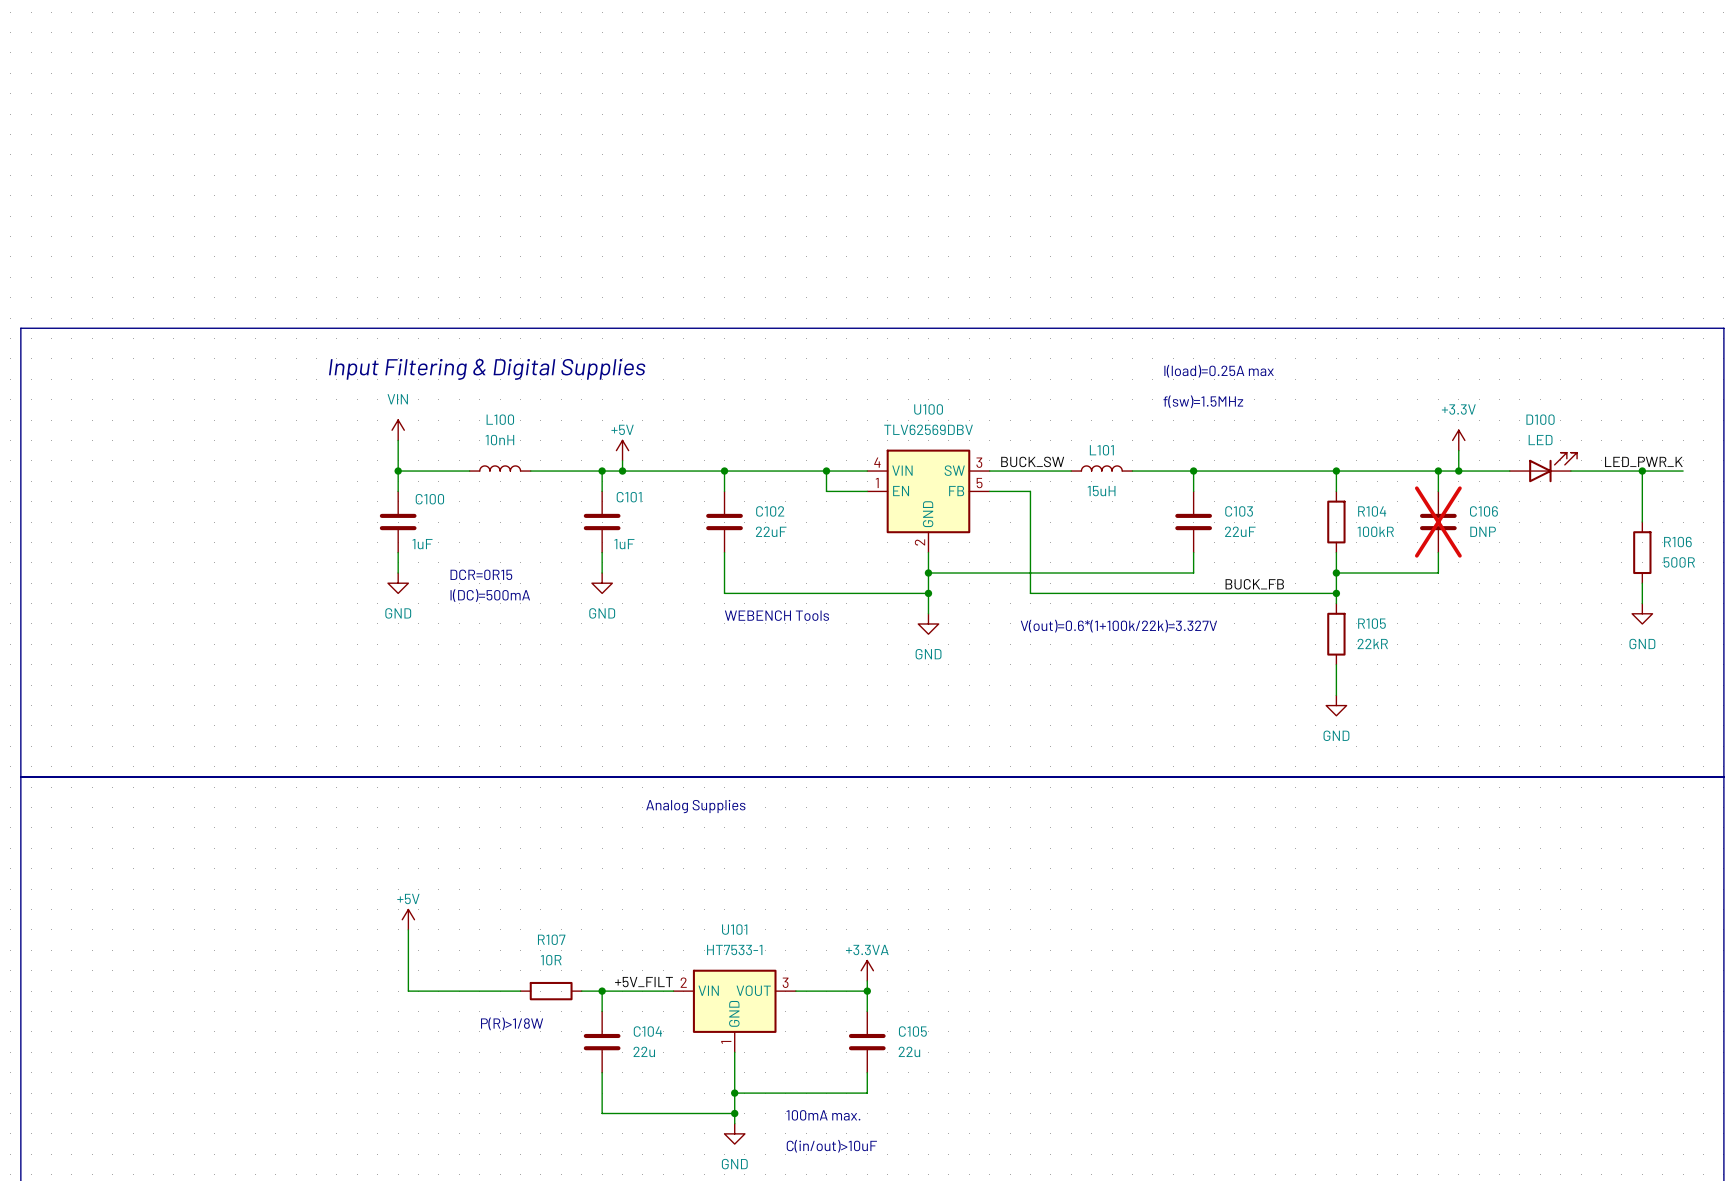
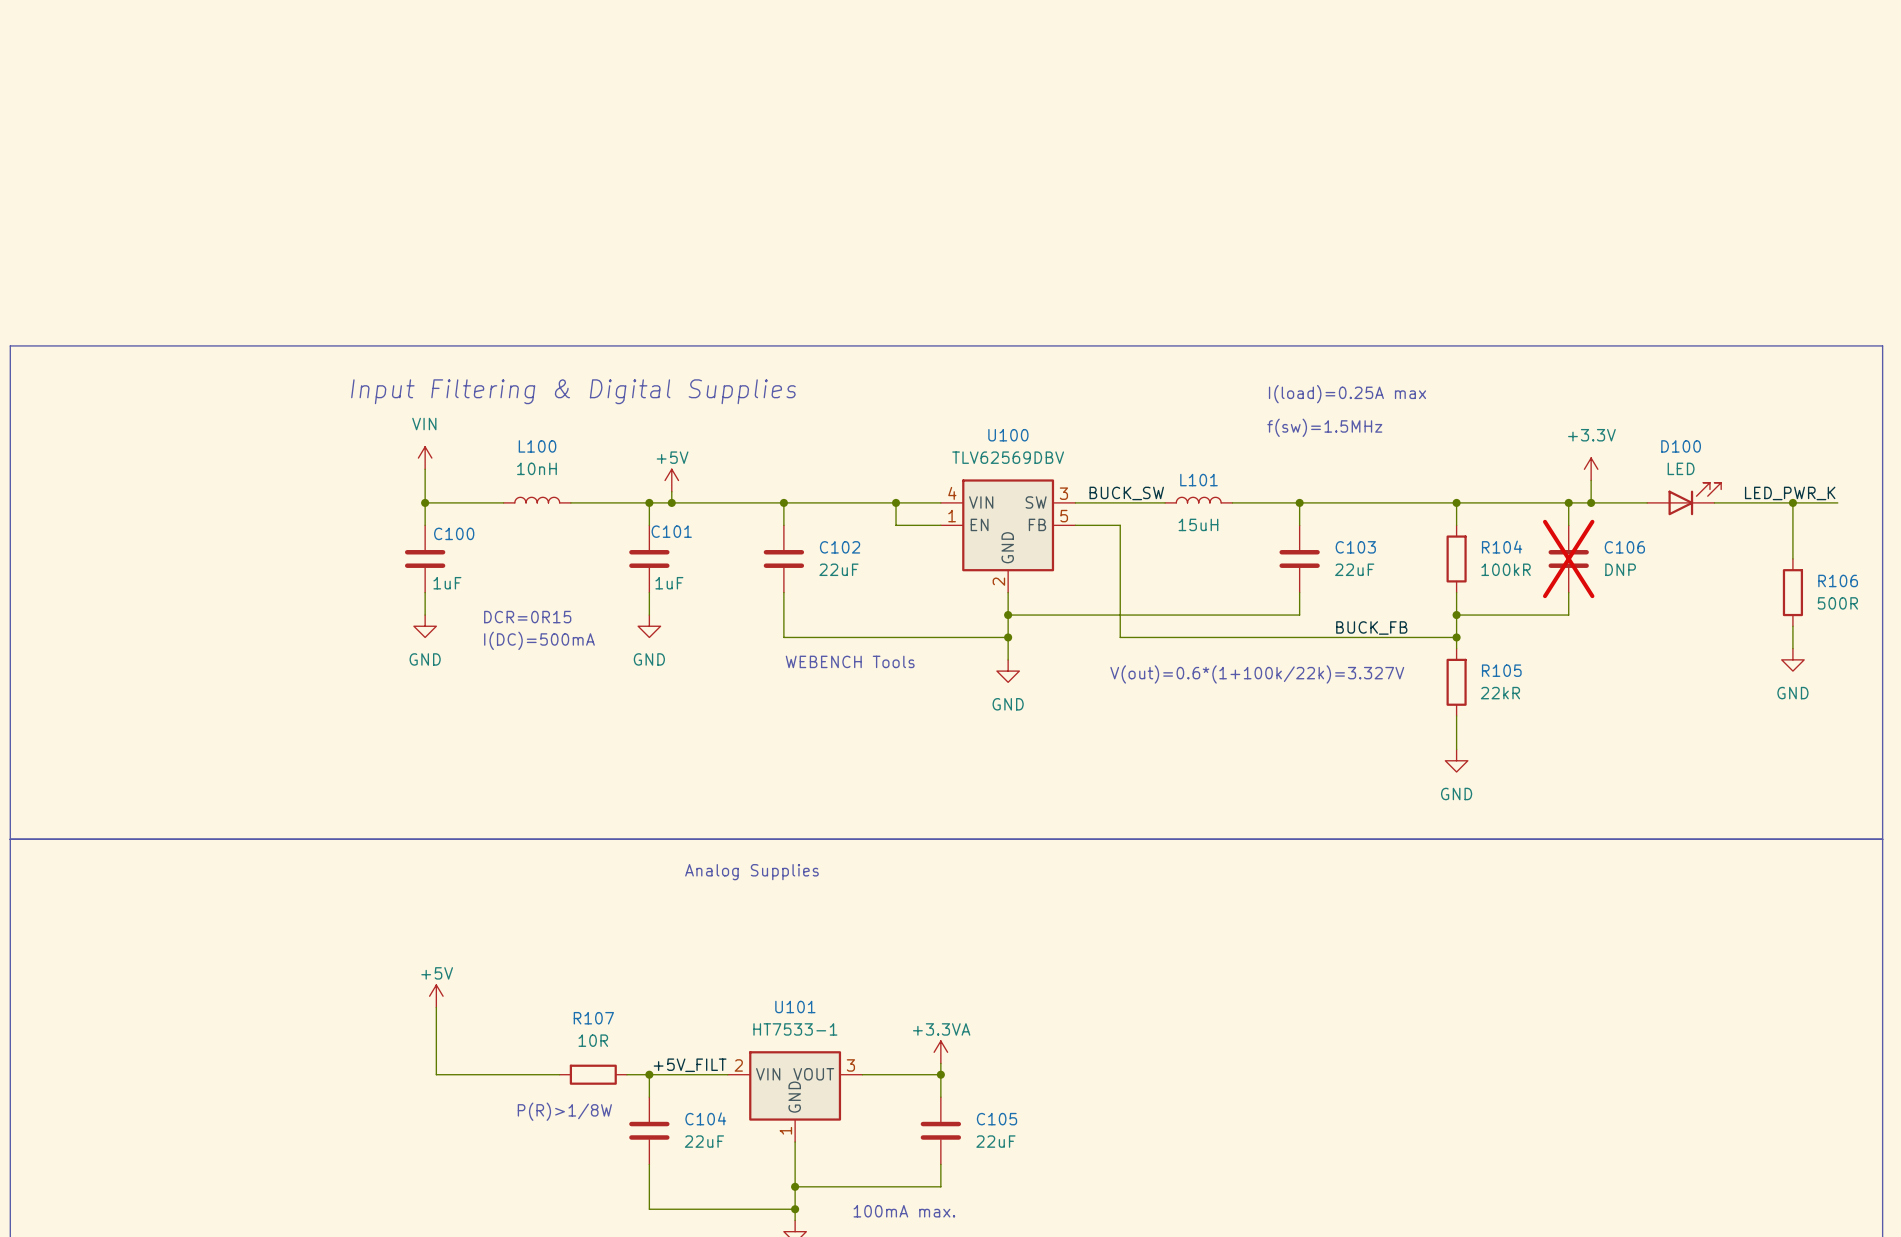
C104 value: 22u (644, 1051) -> 22uF (704, 1141)
C105 value: 22u (909, 1051) -> 22uF (995, 1141)

